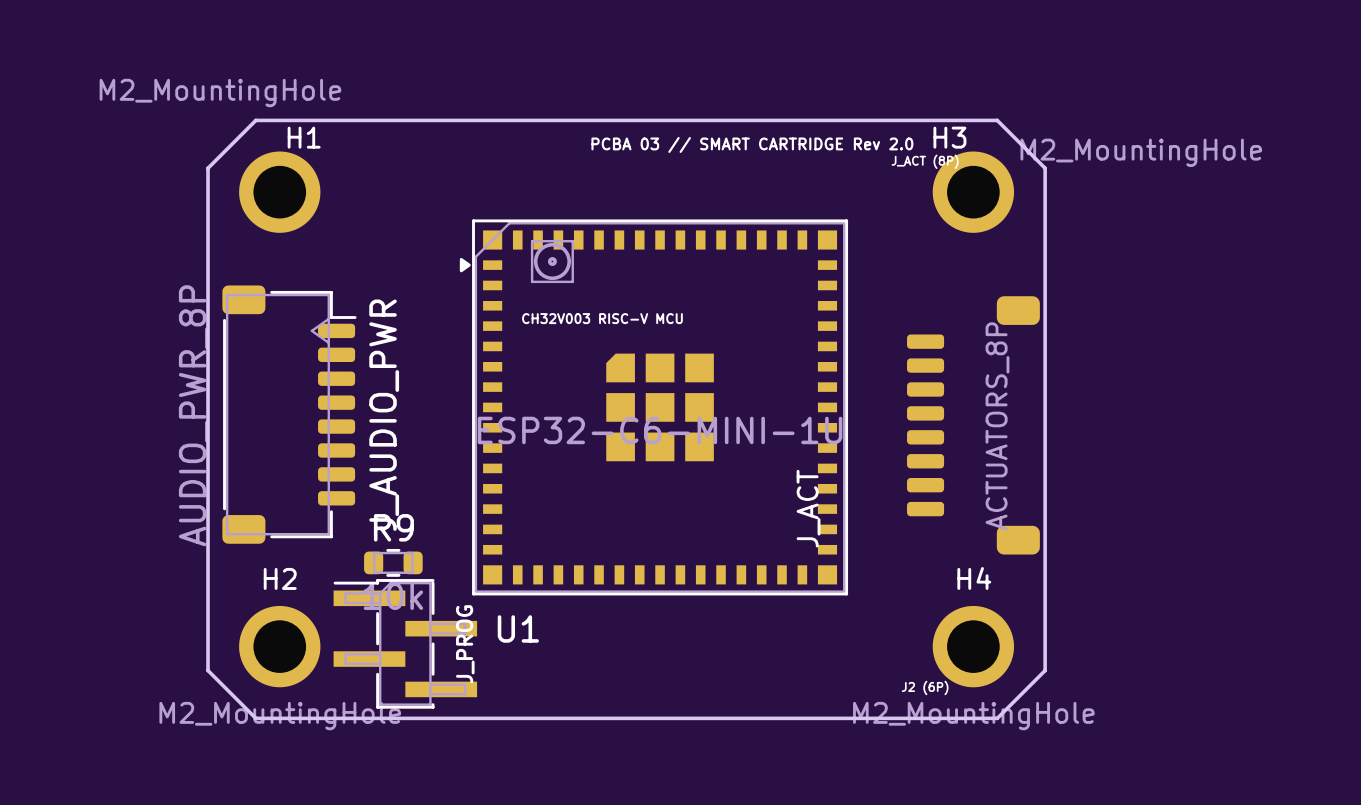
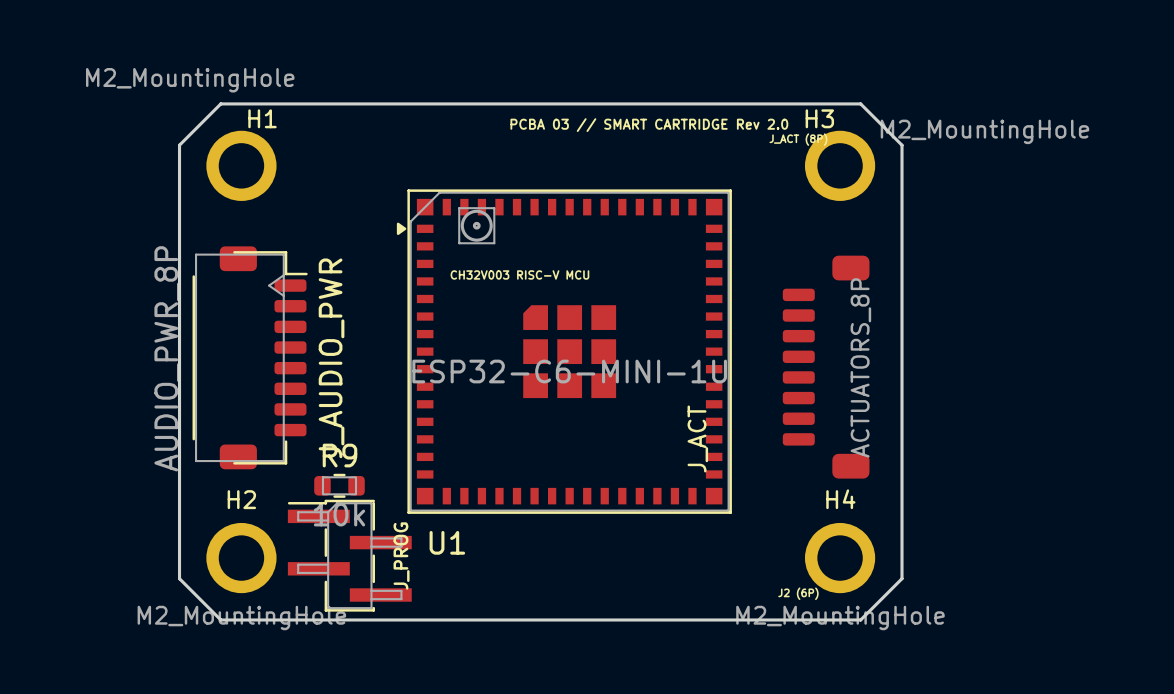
J_AUDIO_PWR footprint: [222, 285, 357, 544] -> [192, 246, 308, 470]
J_ACT footprint: [907, 296, 1040, 555] -> [782, 255, 870, 479]

